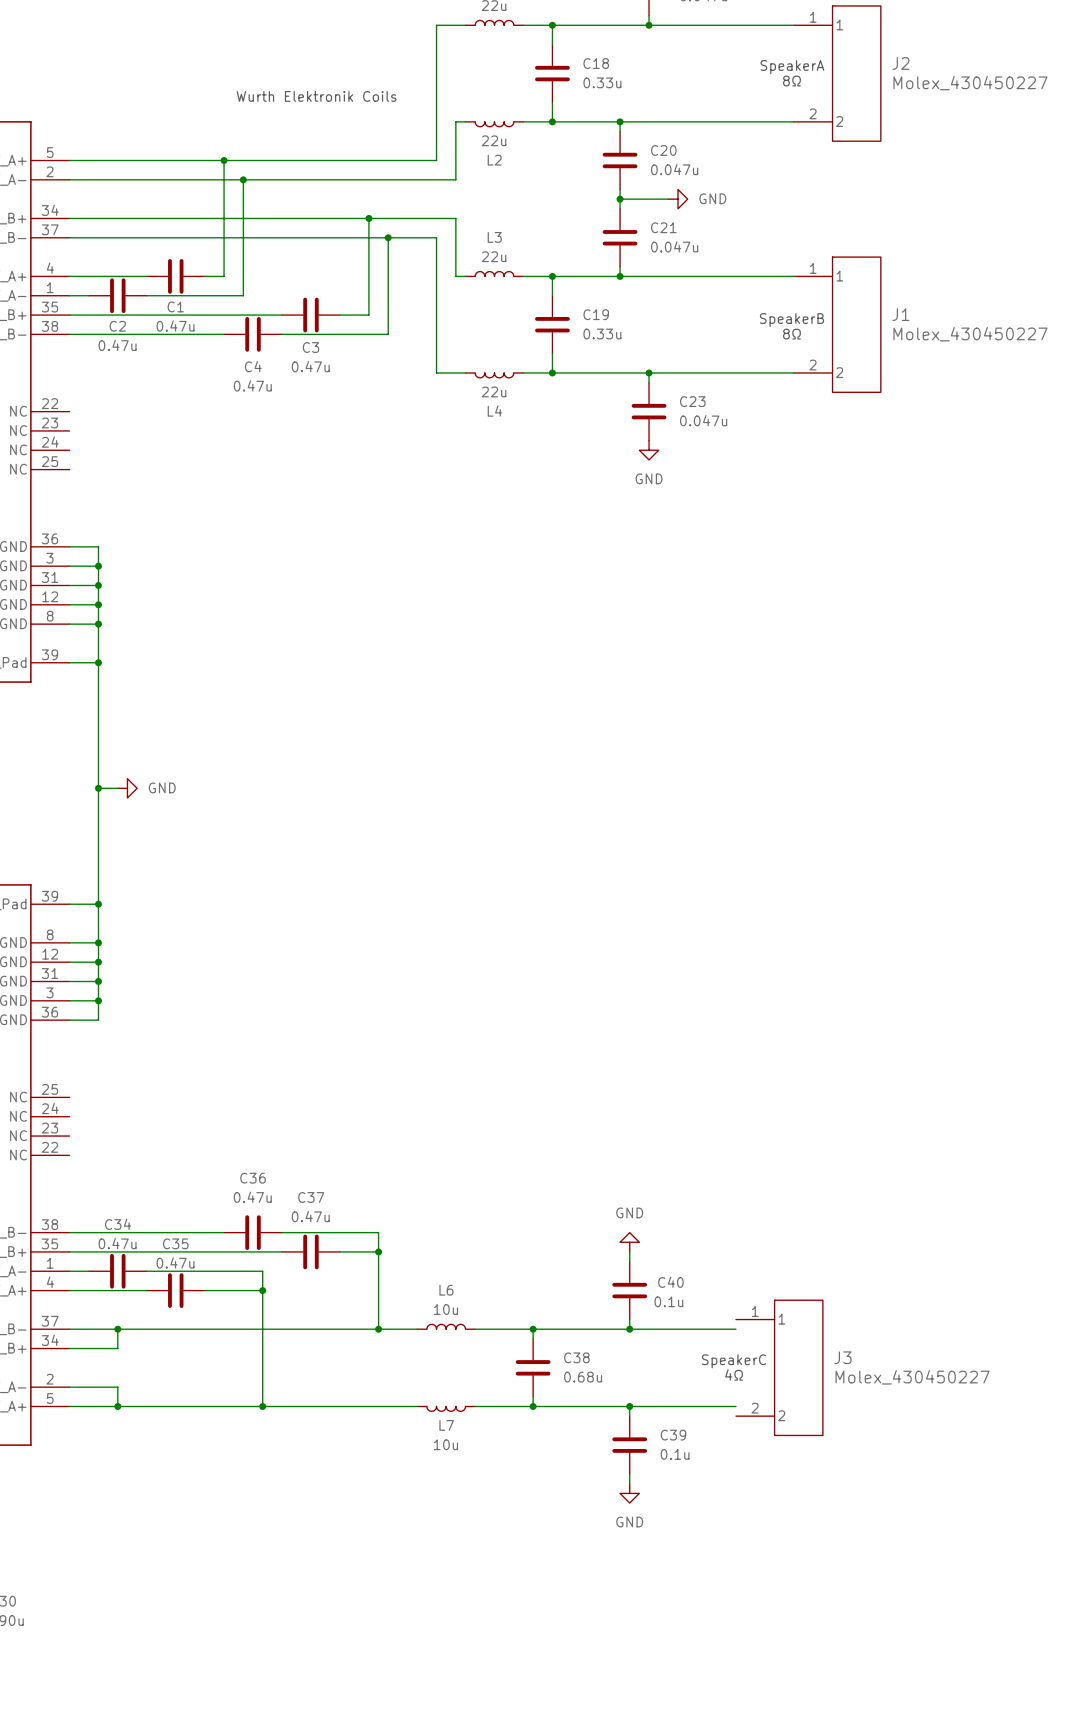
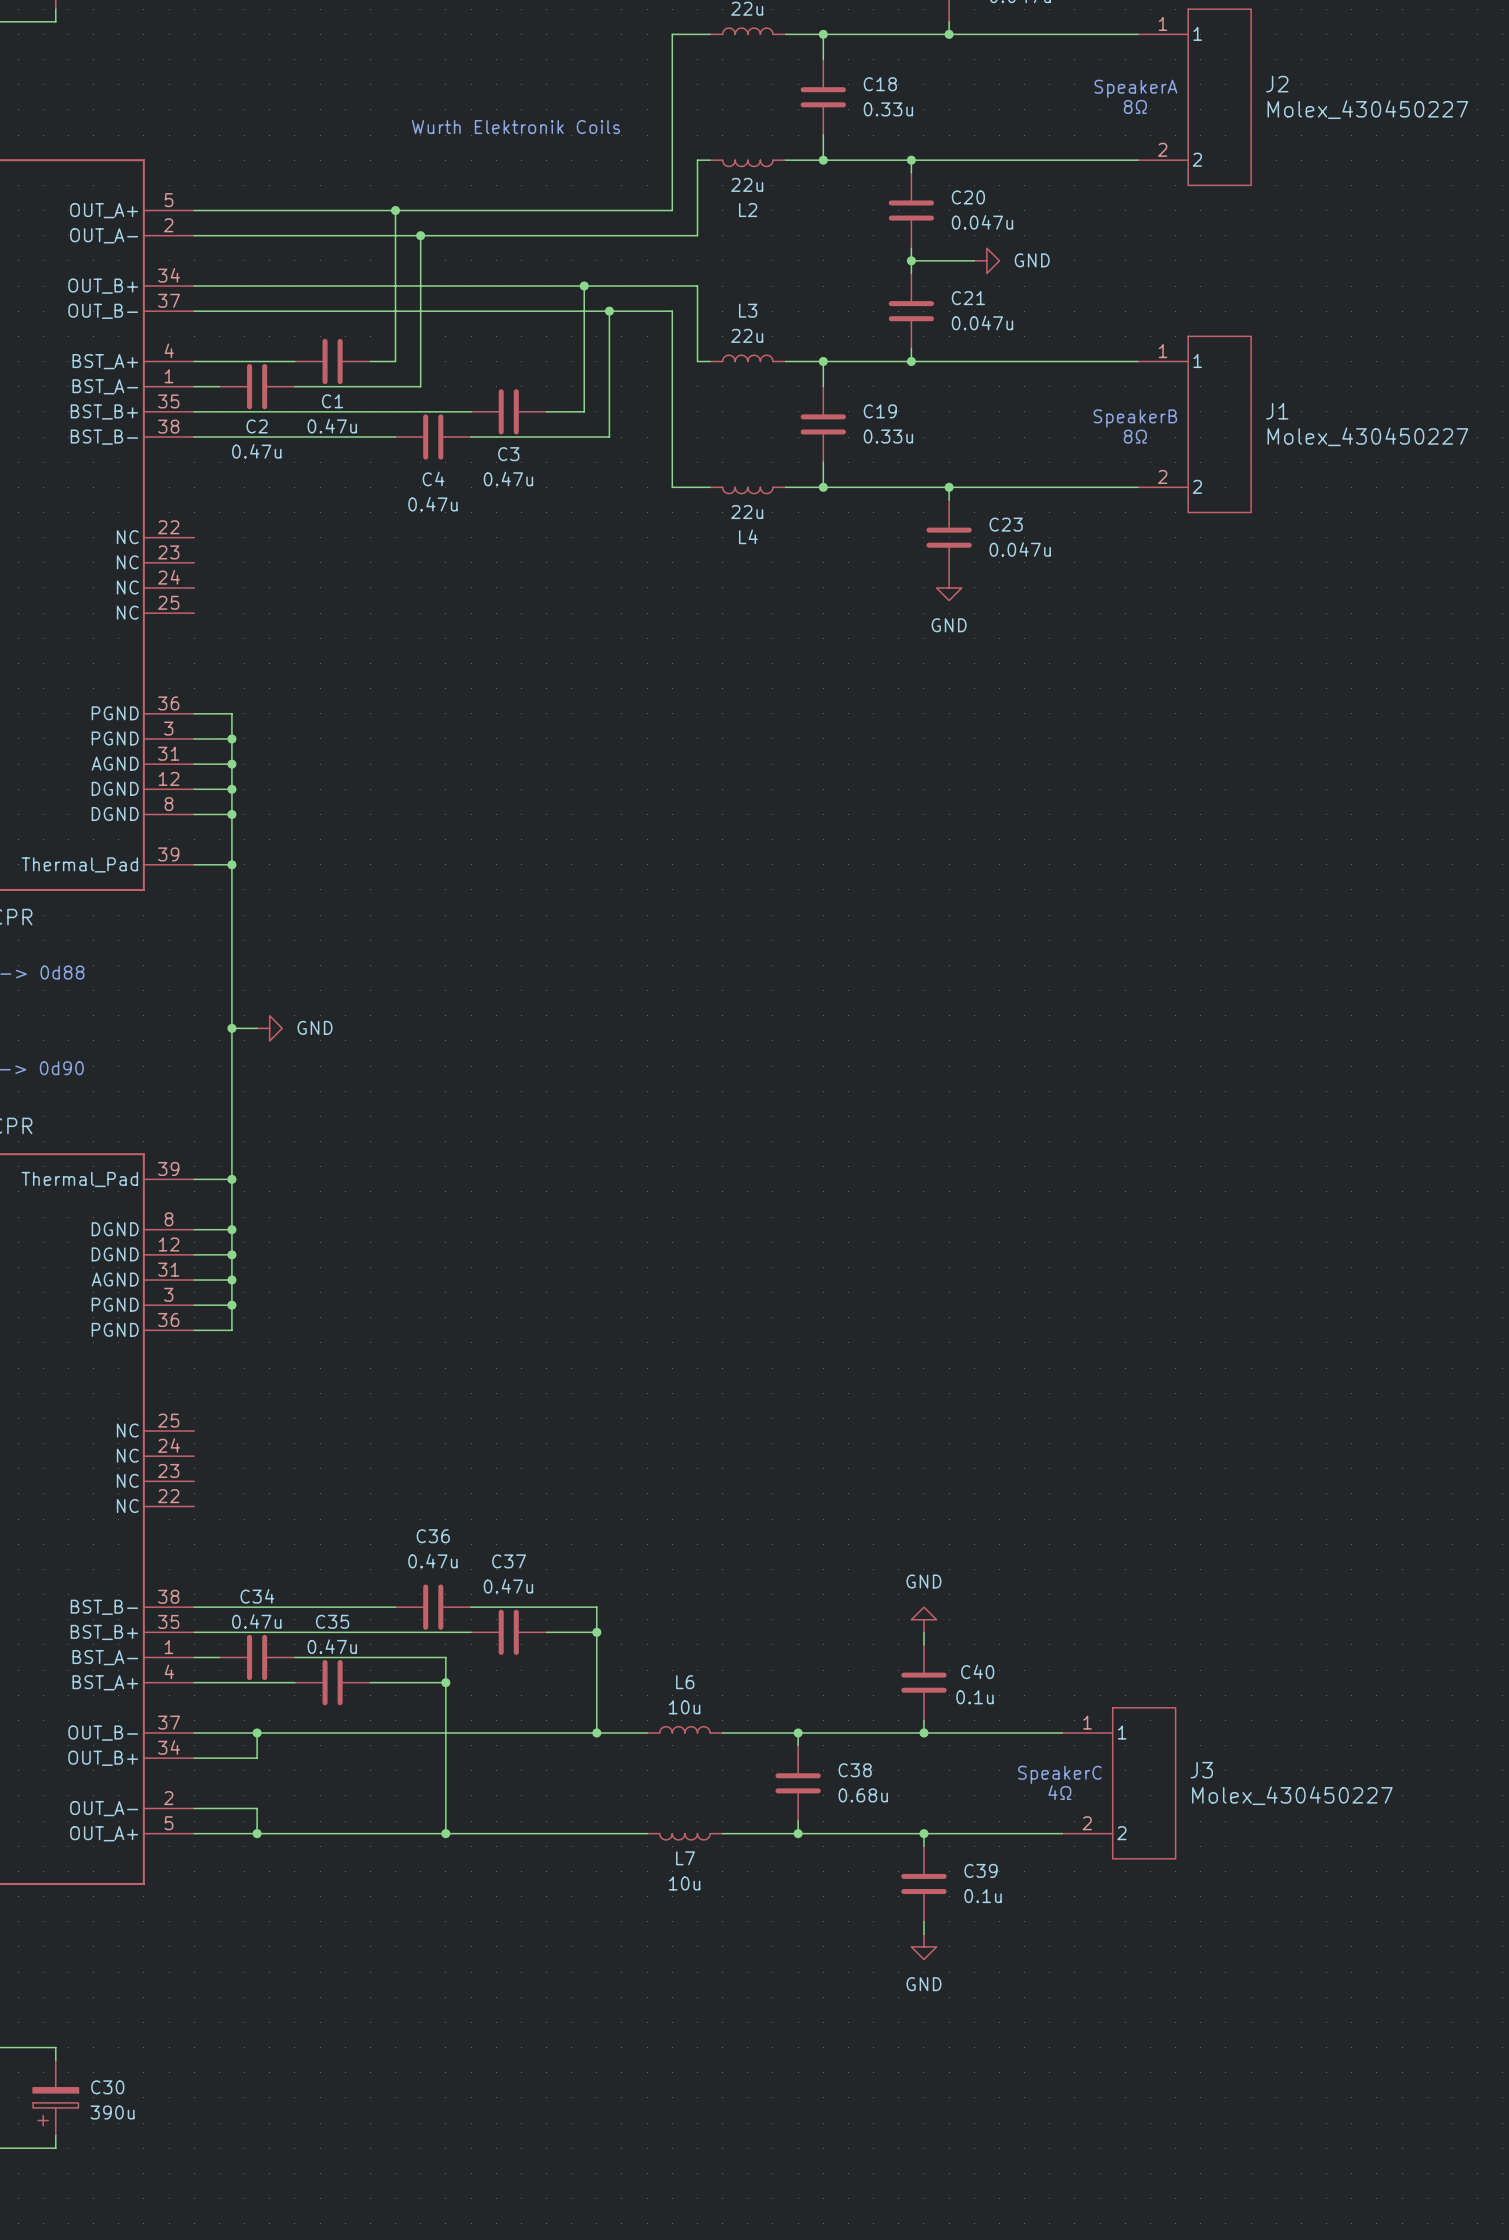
J3 symbol: [735, 1300, 823, 1436] -> [1062, 1707, 1176, 1859]

